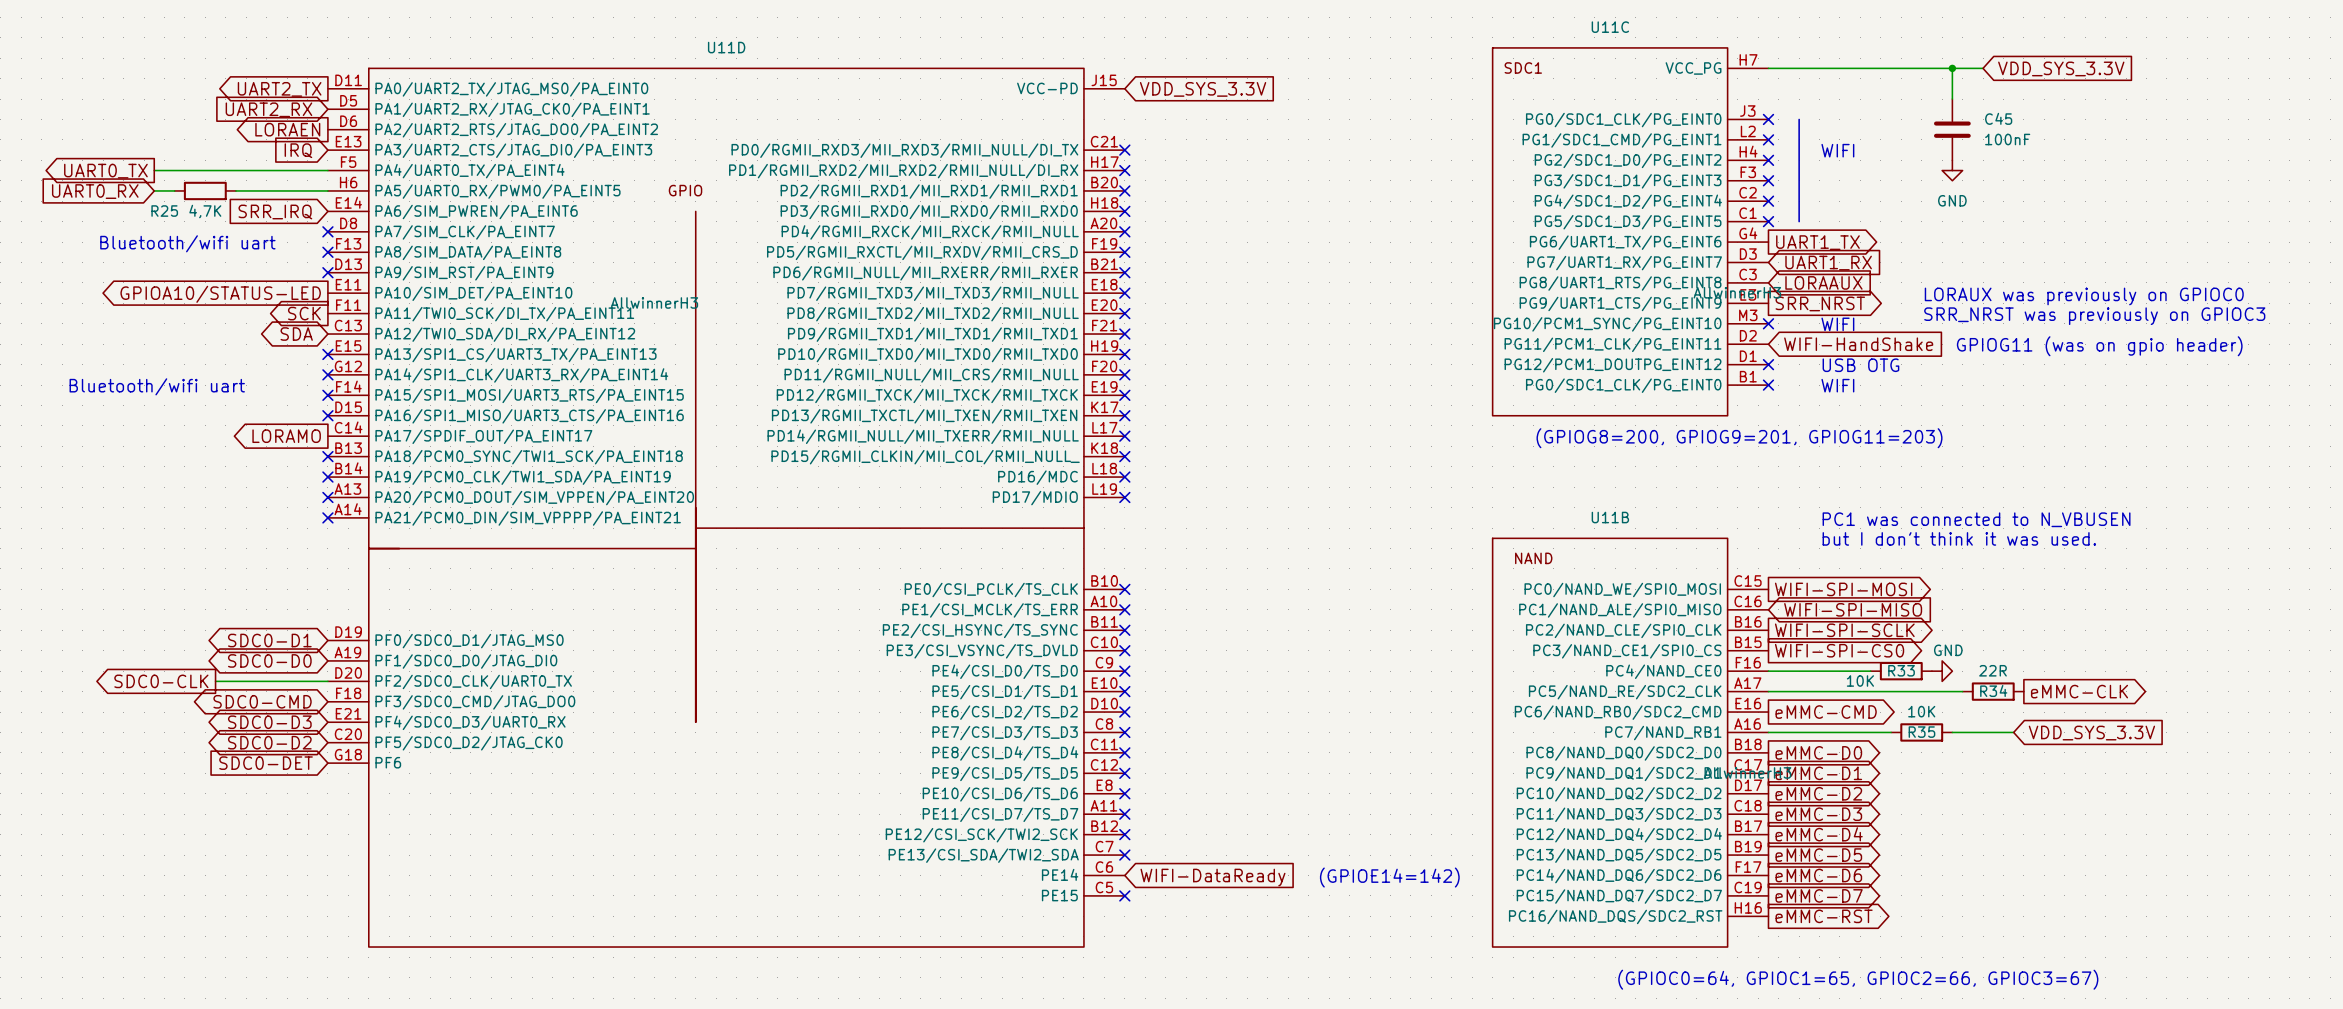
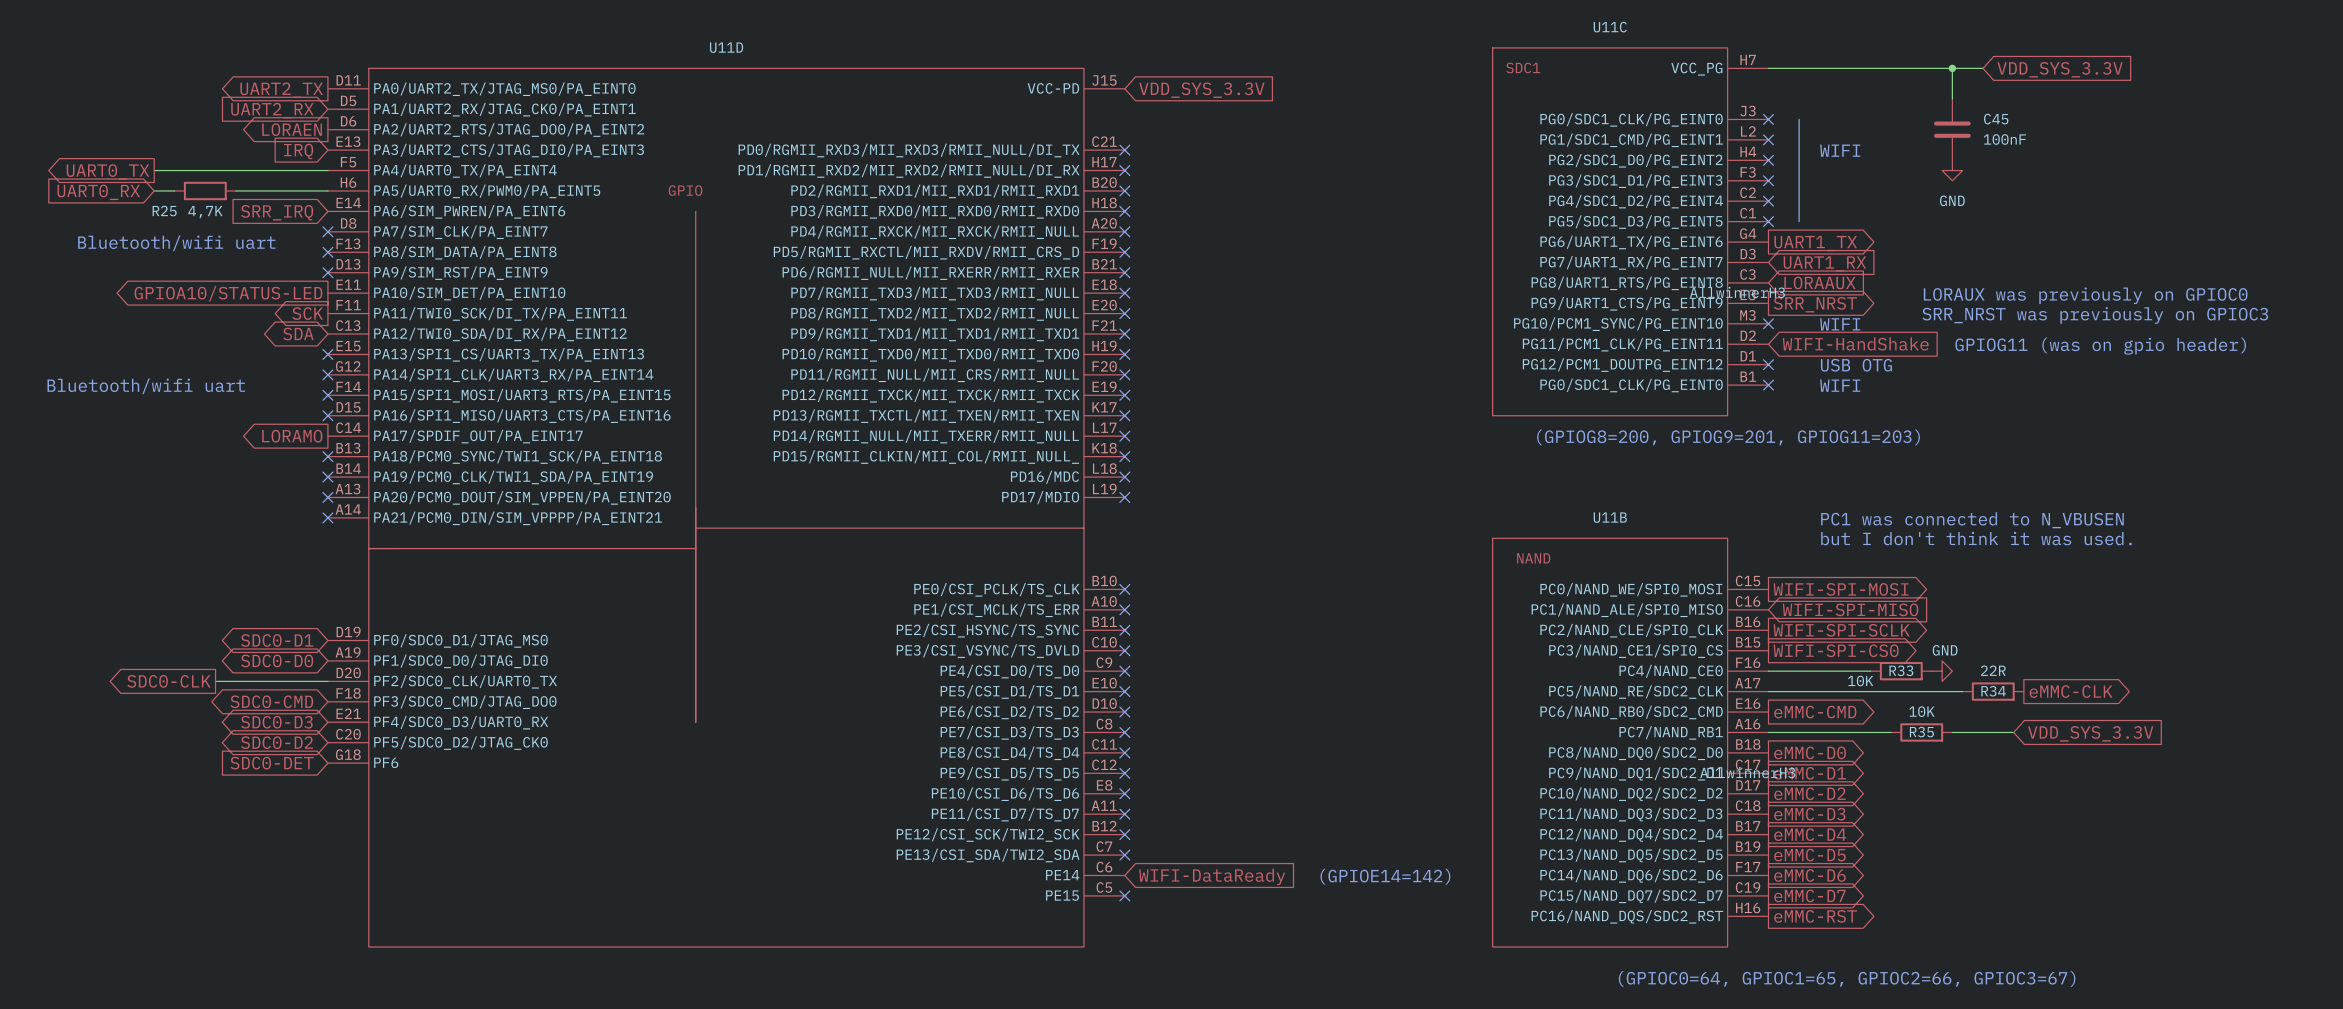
U11D value: AllwinnerH3 (654, 302) -> none

